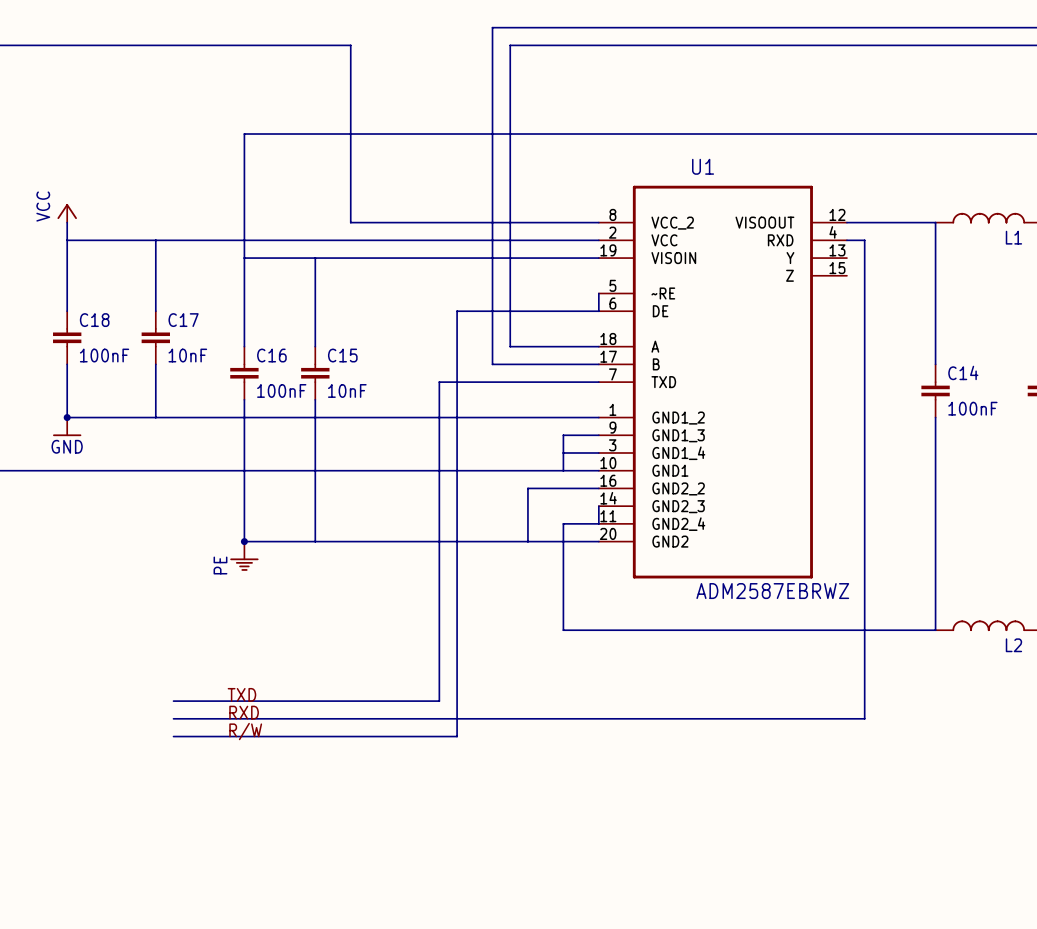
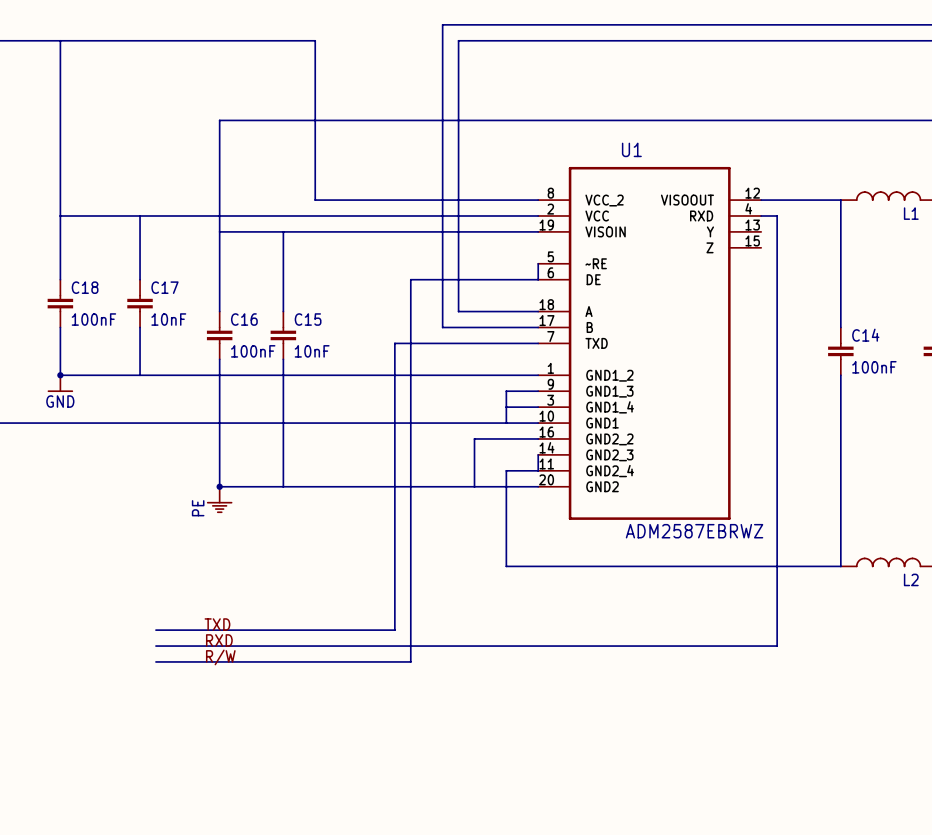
wire: none -> (60, 40) (60, 200)
power symbol: VCC (67, 213) -> none

